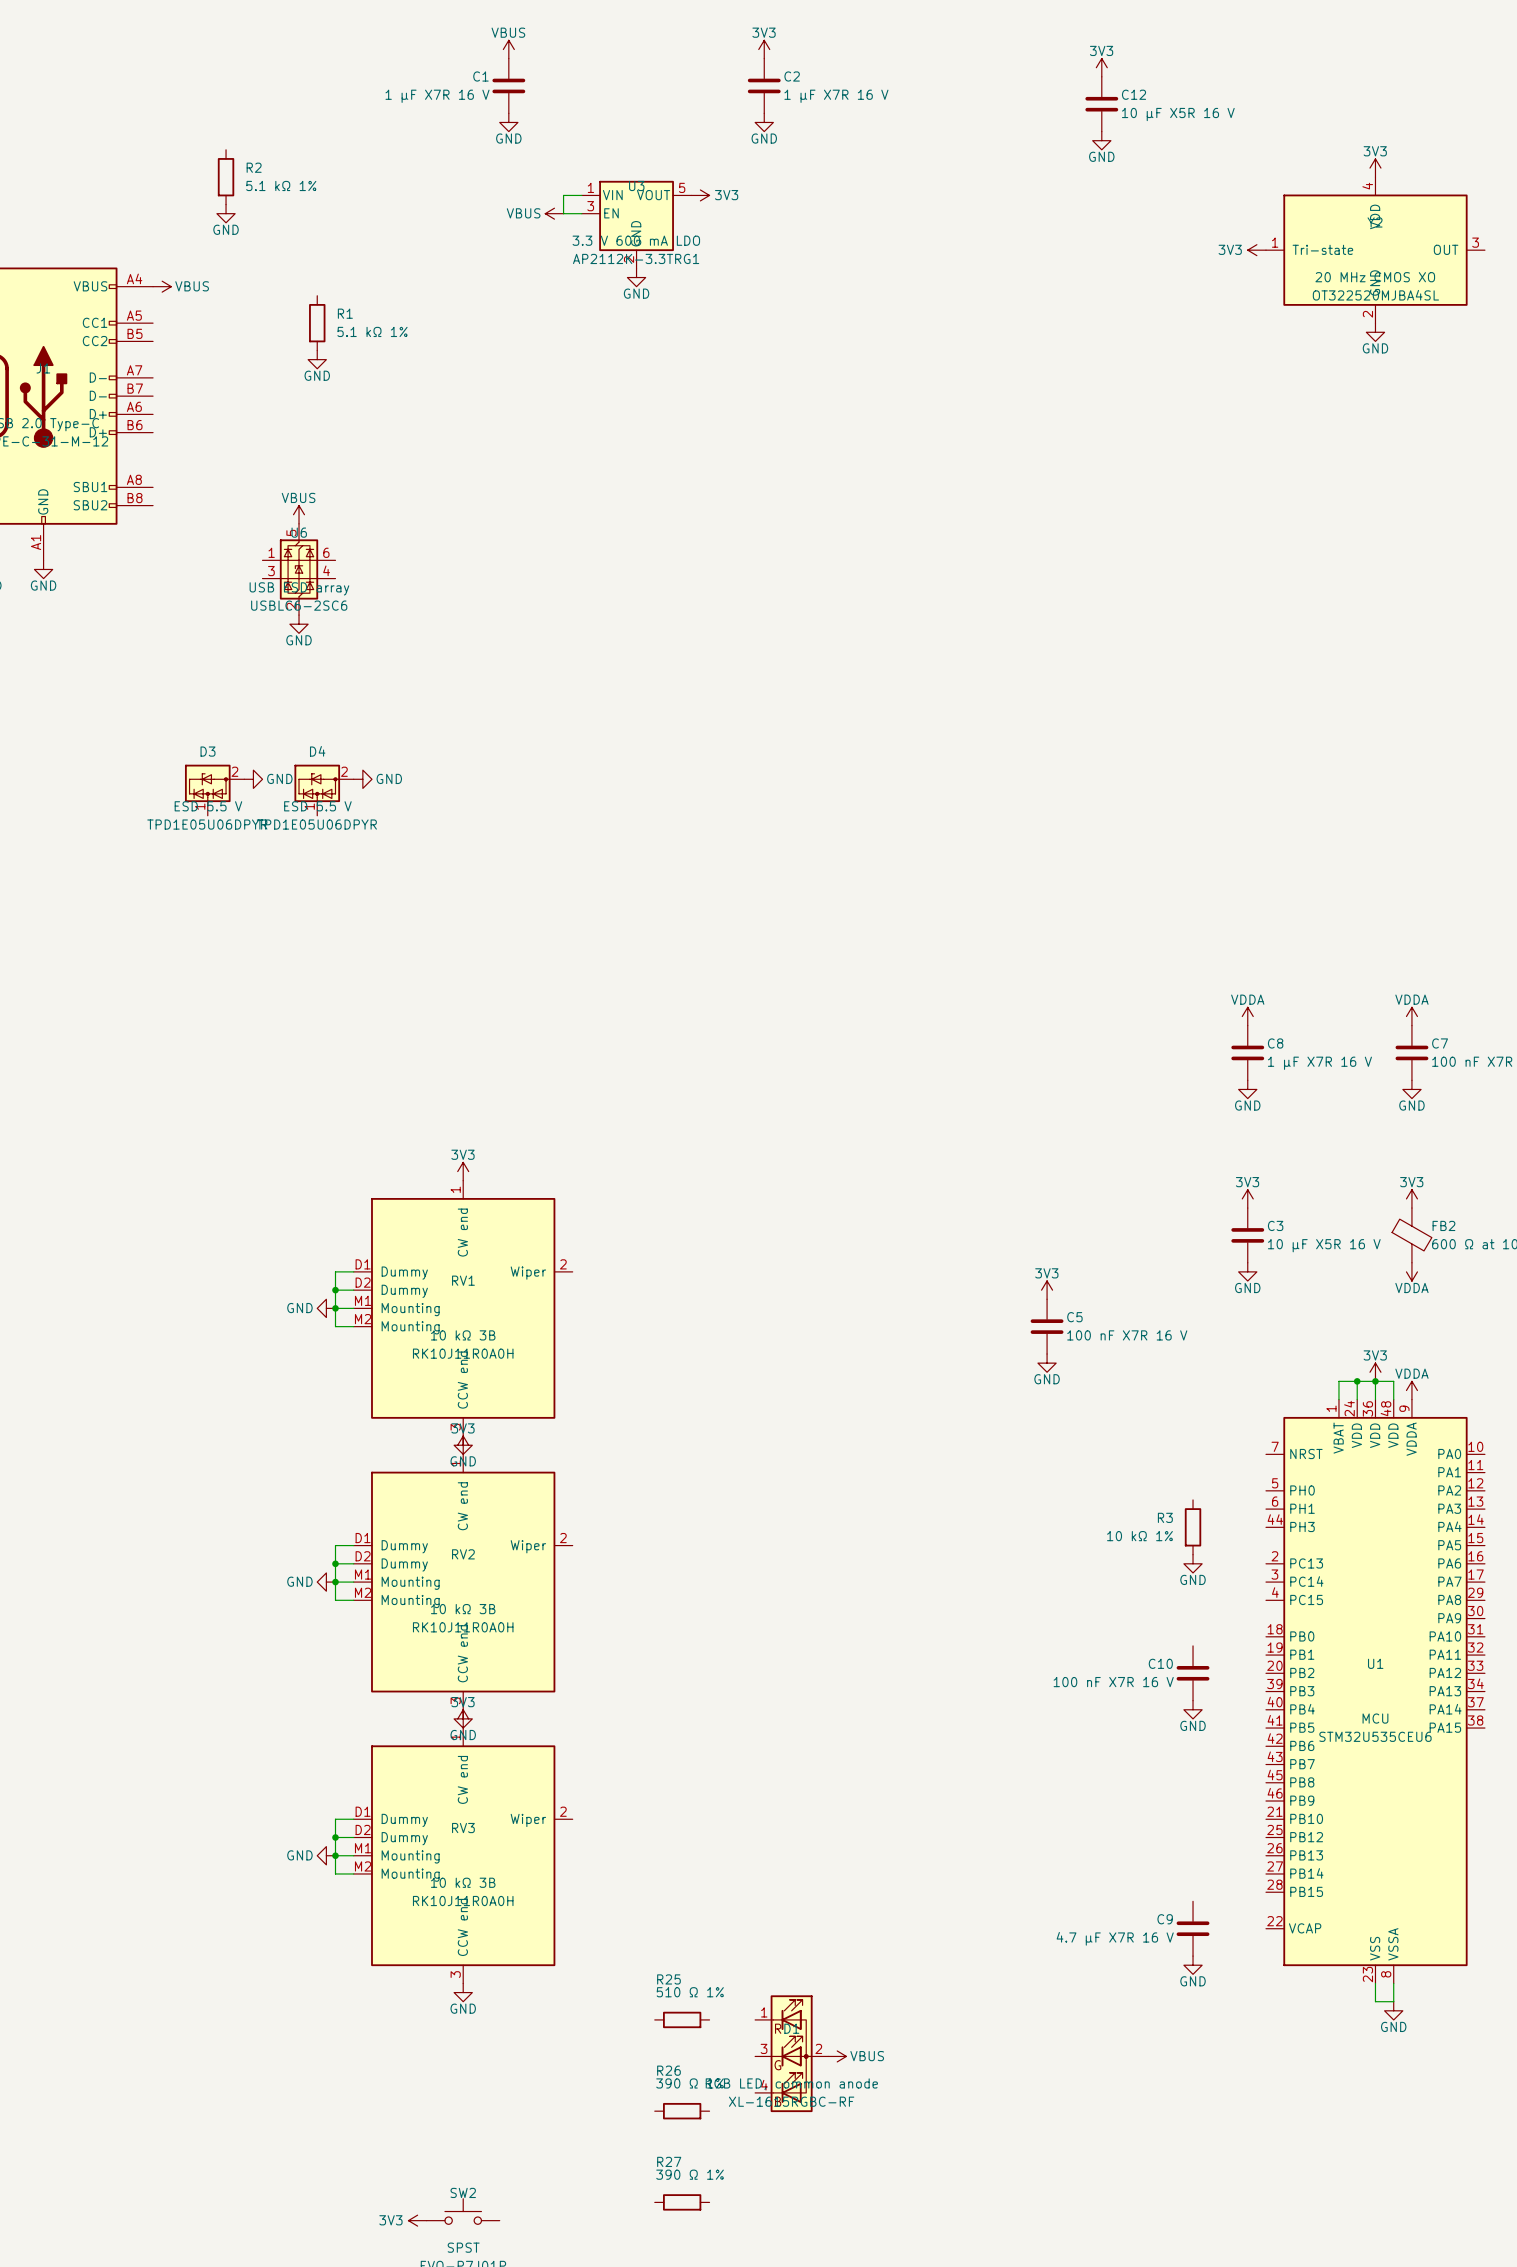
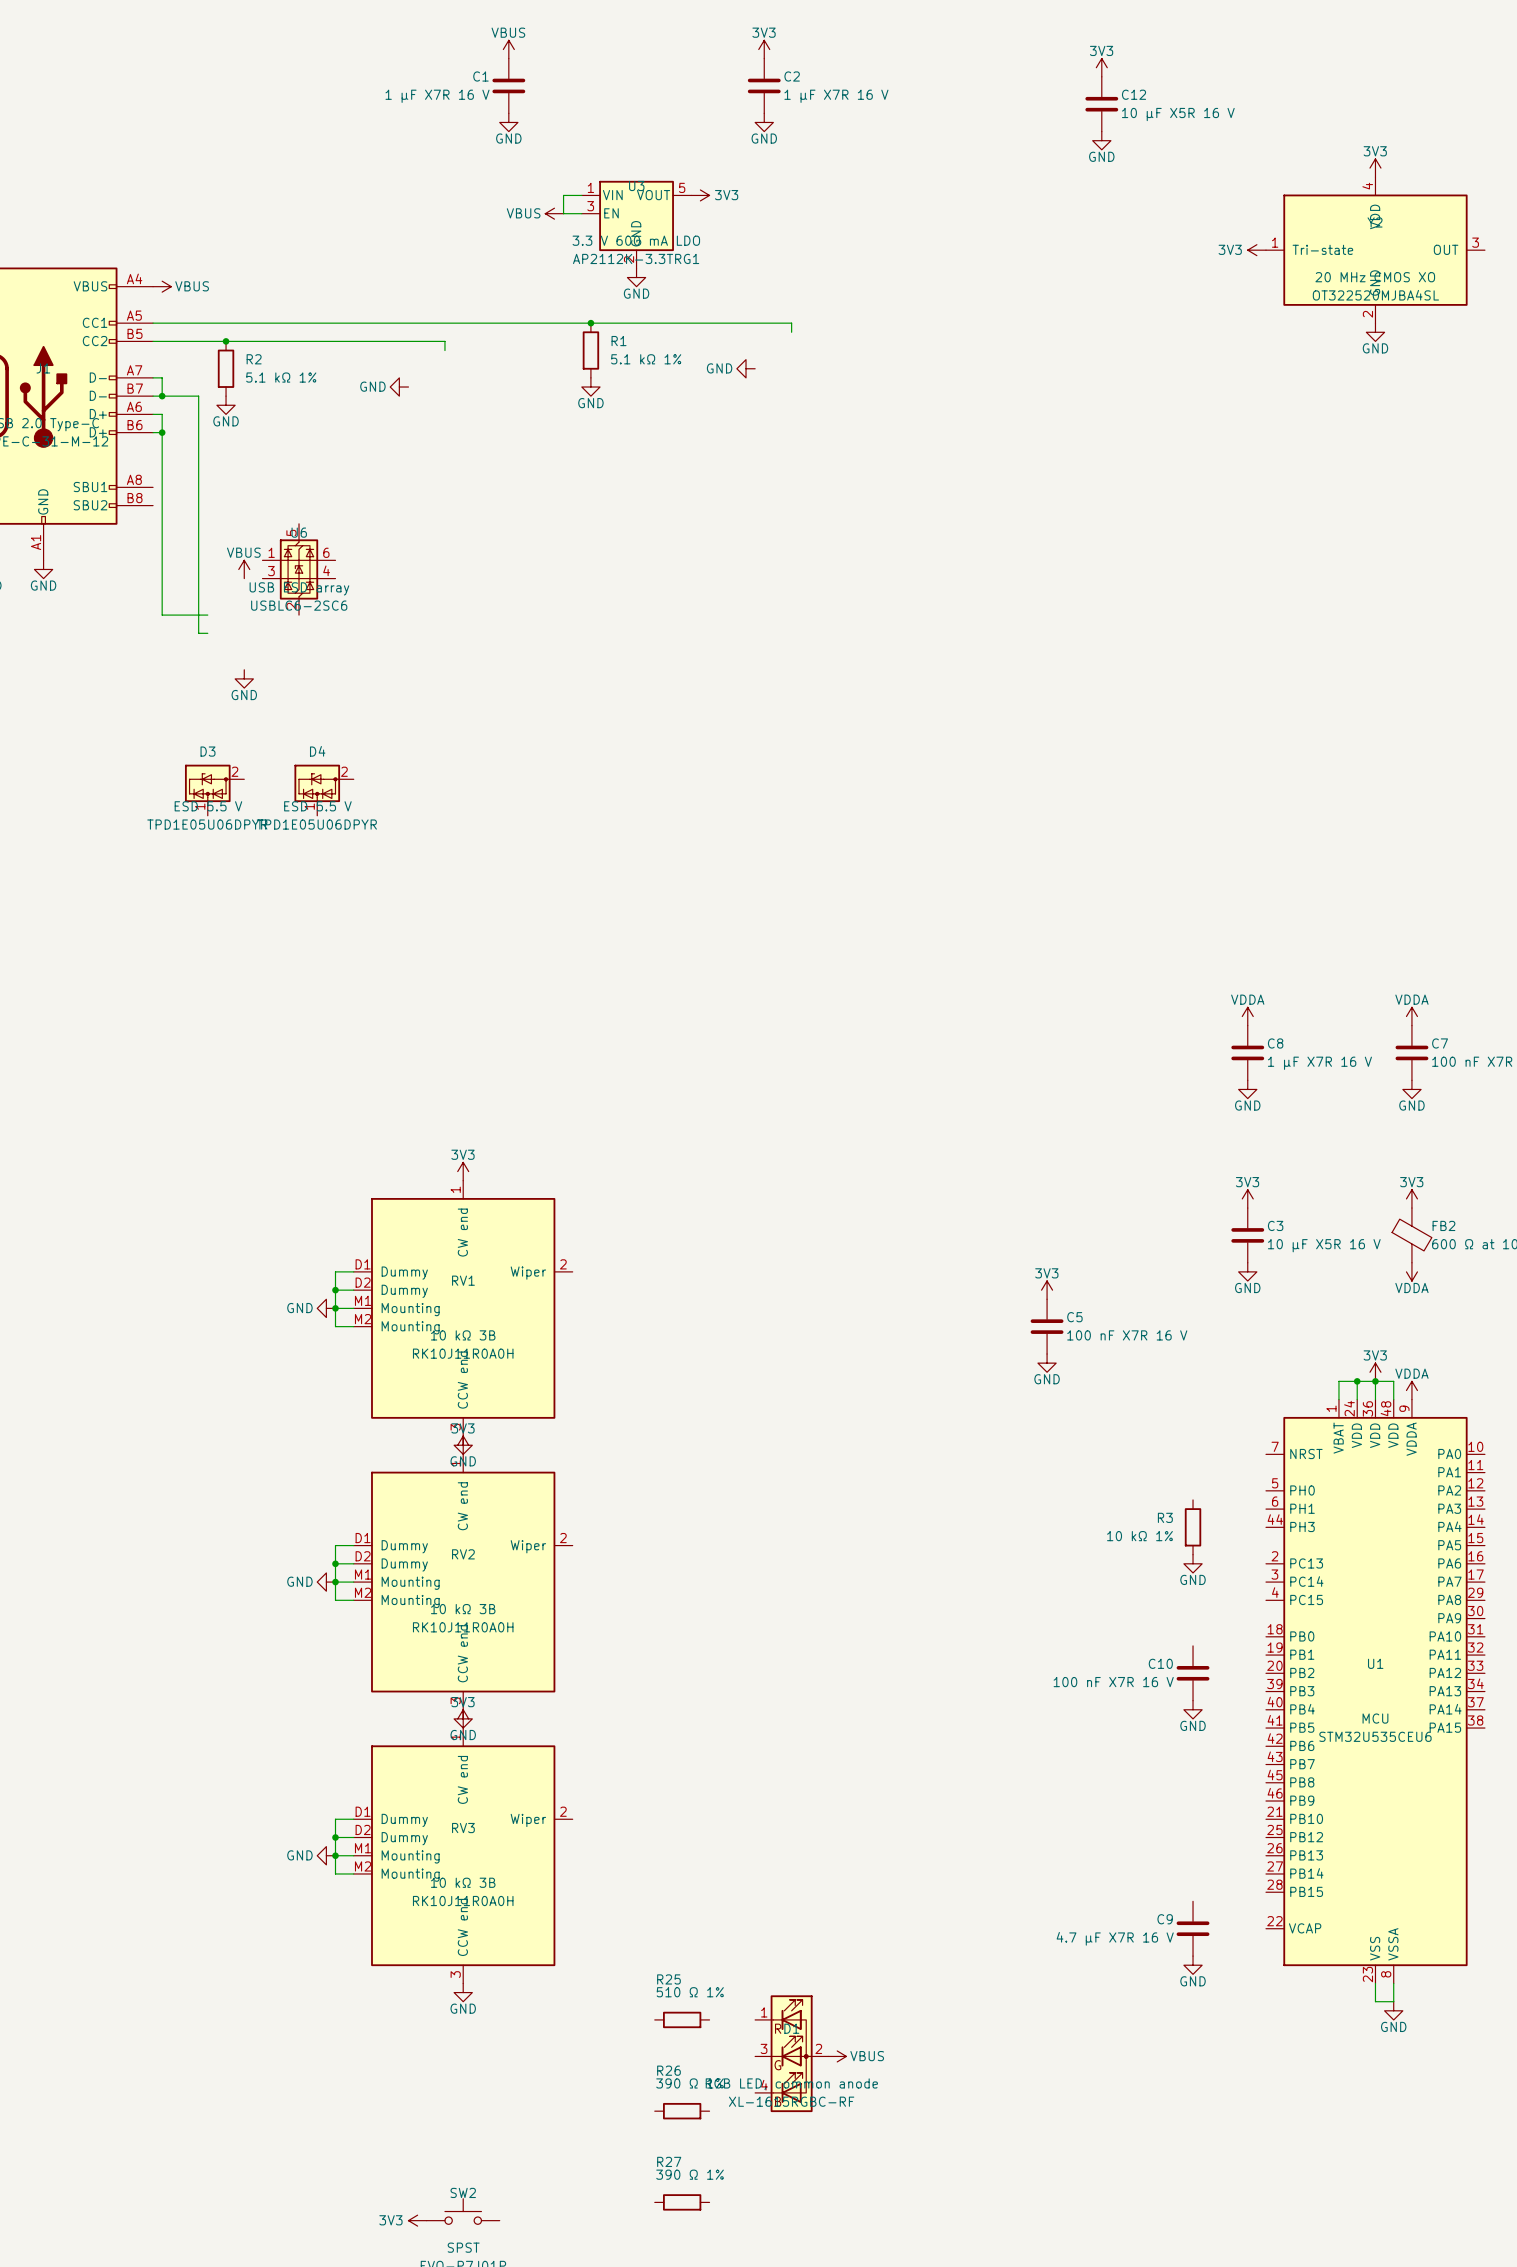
R2 position: (226, 177) -> (226, 368)
power symbol: GND (226, 213) -> none
wire: none -> (153, 323) (791, 323) (791, 332)
R1 position: (317, 323) -> (590, 350)
junction: none -> (590, 323)
wire: none -> (153, 341) (444, 341) (444, 350)
junction: none -> (226, 341)
power symbol: GND (317, 359) -> none
power symbol: none -> GND (746, 368)
wire: none -> (153, 377) (162, 377) (162, 396)
power symbol: none -> GND (399, 387)
power symbol: none -> GND (590, 387)
wire: none -> (153, 396) (198, 396) (198, 633) (207, 633)
junction: none -> (162, 396)
power symbol: none -> GND (226, 405)
wire: none -> (153, 414) (162, 414) (162, 615) (207, 615)
wire: none -> (153, 432) (162, 432)
junction: none -> (162, 432)
power symbol position: VBUS (299, 514) -> VBUS (244, 569)
power symbol: GND (299, 624) -> none
power symbol: none -> GND (244, 678)
power symbol: GND (253, 779) -> none
power symbol: GND (362, 779) -> none

